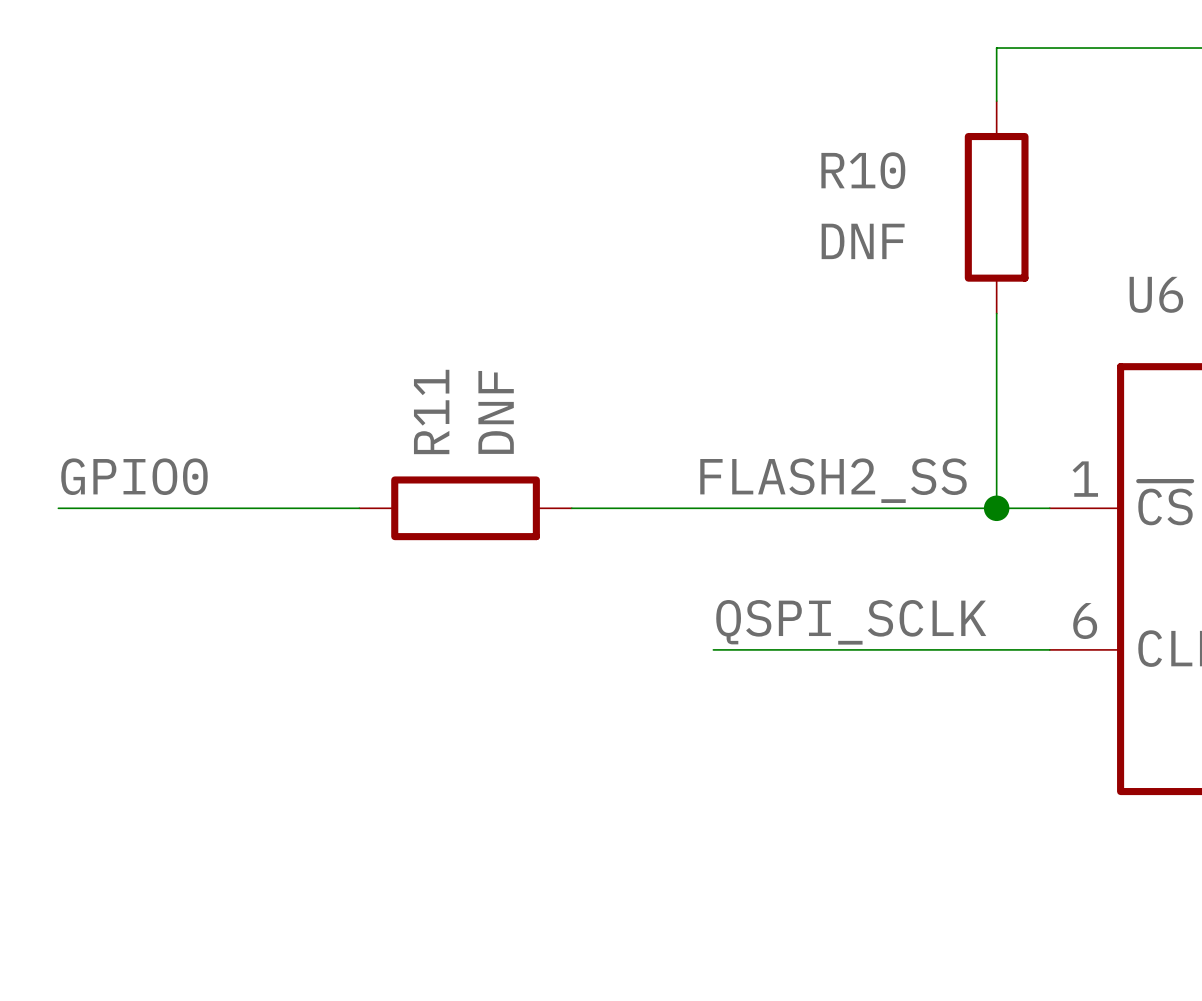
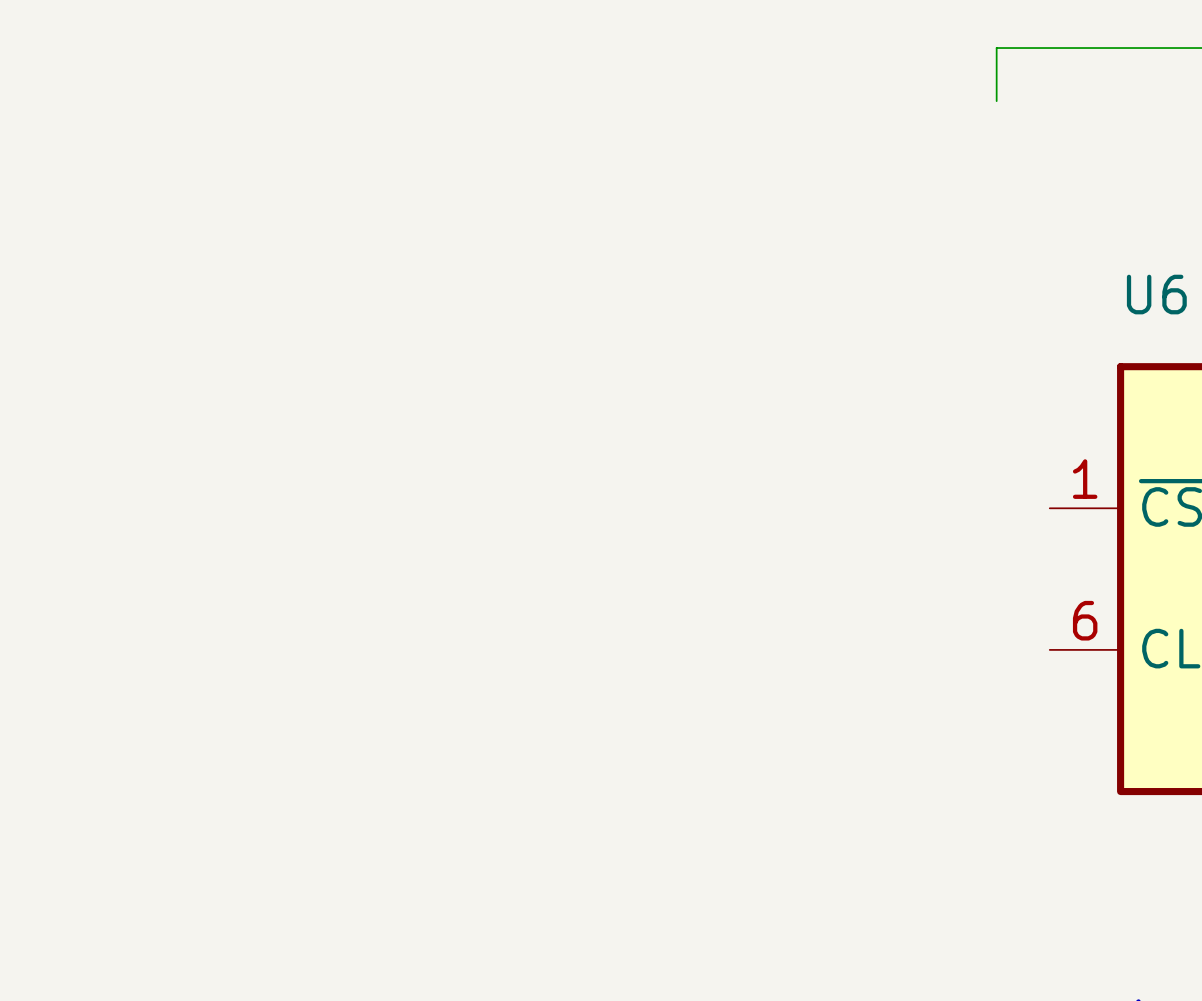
R10: DNF (996, 207) -> none
wire: (996, 313) (996, 508) -> none
label: GPIO0 (134, 476) -> none
label: FLASH2_SS (833, 480) -> none
wire: (58, 508) (359, 508) -> none
R11: DNF (465, 508) -> none
wire: (571, 508) (1049, 508) -> none
junction: (996, 508) -> none
label: QSPI_SCLK (851, 622) -> none
wire: (713, 649) (1049, 649) -> none

